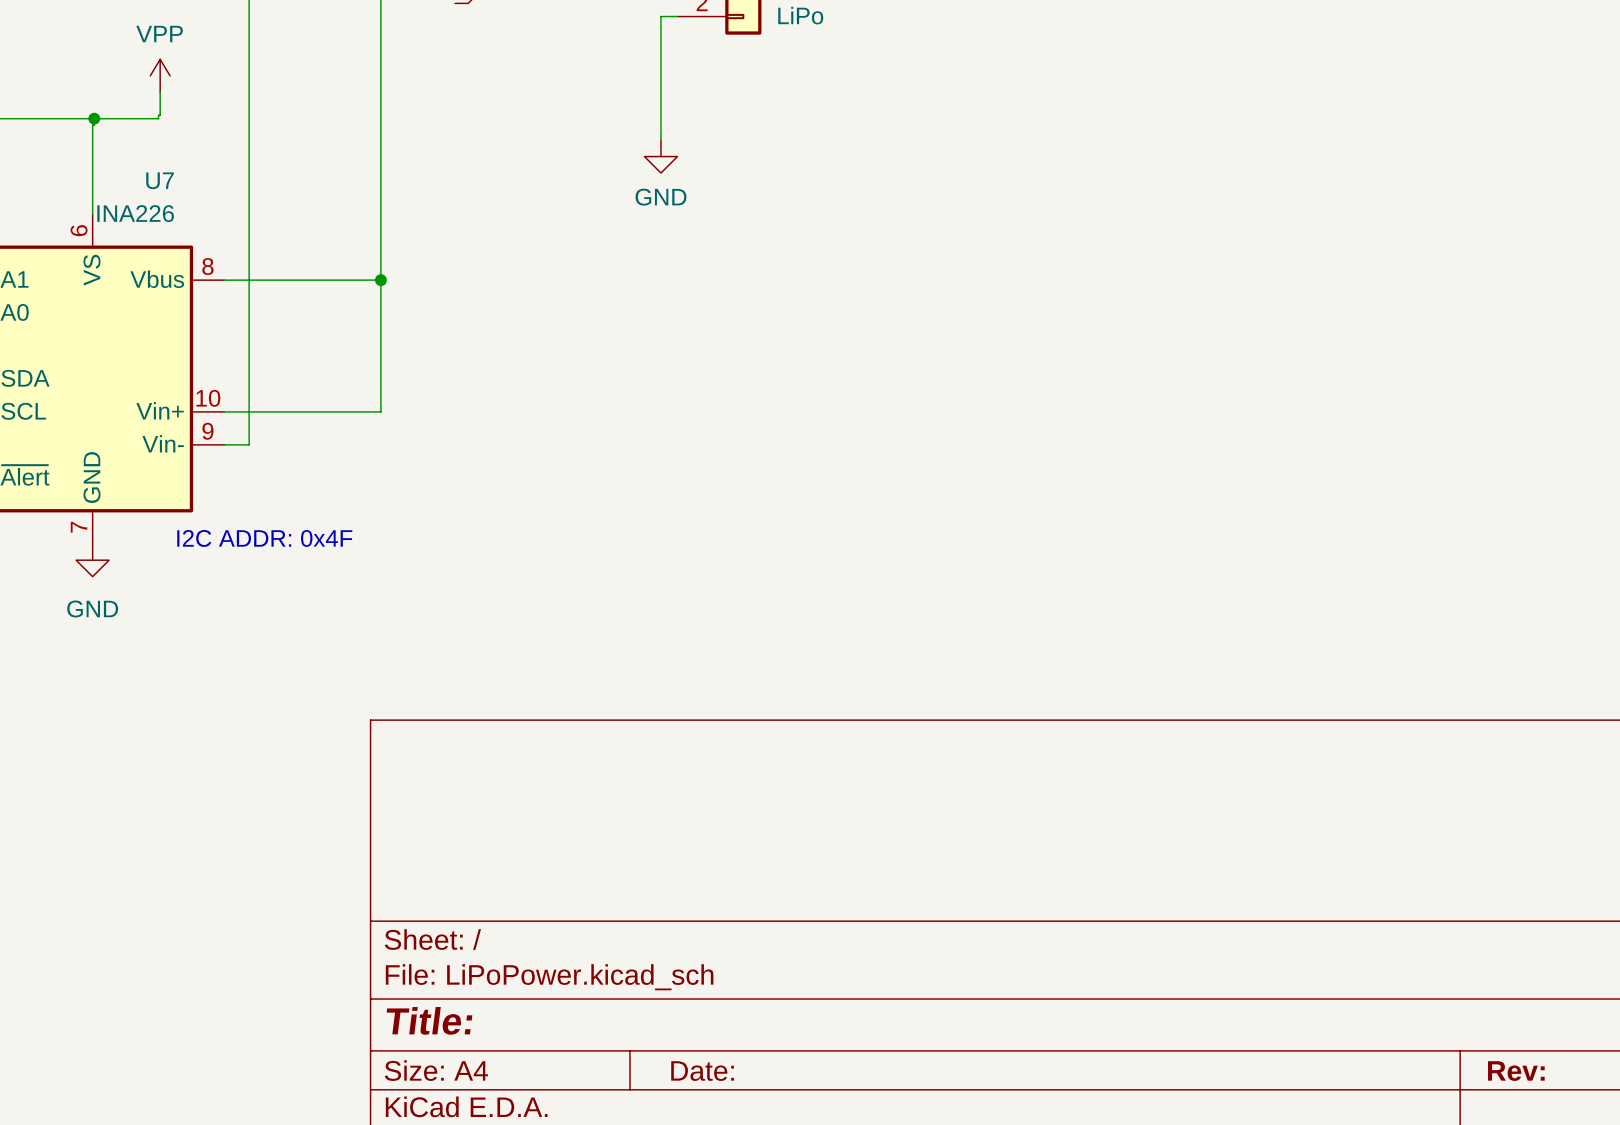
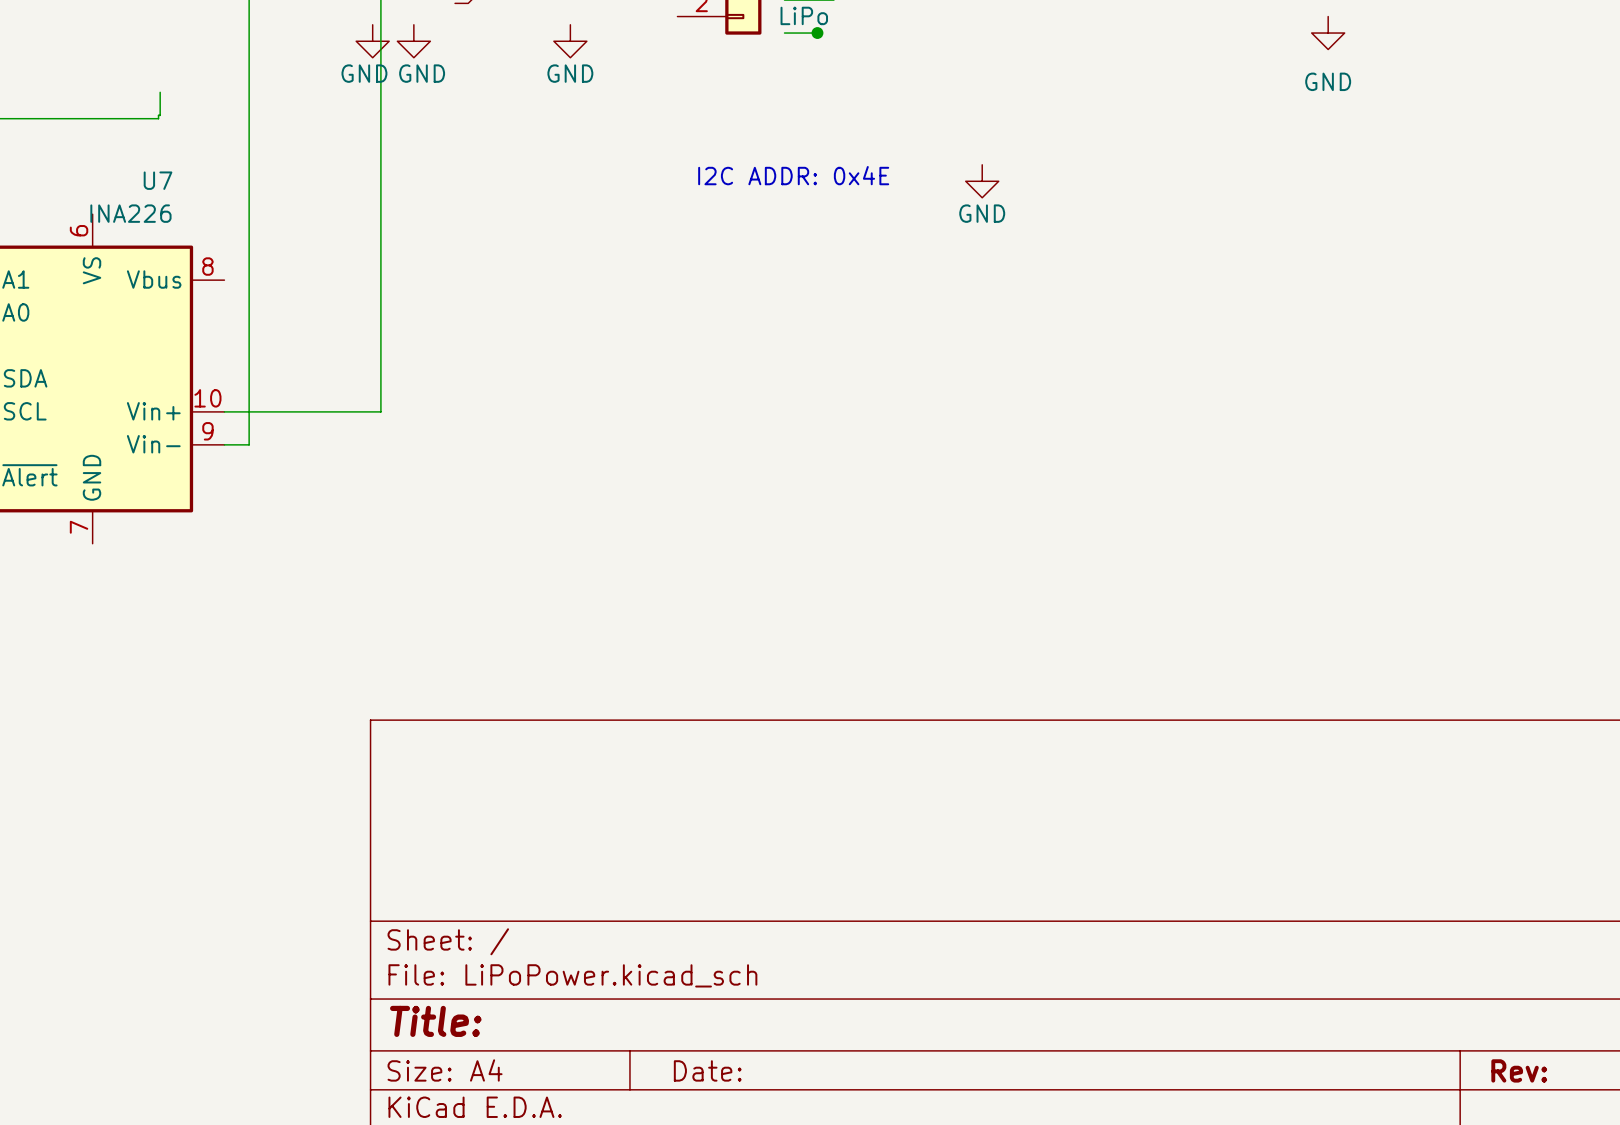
wire: none -> (784, 0) (833, 0)
wire: (677, 16) (660, 16) (660, 140) -> none
wire: none -> (784, 33) (817, 33)
junction: none -> (817, 33)
power symbol: none -> GND (1328, 33)
power symbol: none -> GND (372, 41)
power symbol: none -> GND (413, 41)
power symbol: none -> GND (570, 41)
power symbol: VPP (160, 75) -> none
wire: (94, 118) (94, 125) (92, 125) (92, 214) -> none
junction: (94, 118) -> none
power symbol: GND (660, 156) -> none
text: none -> I2C ADDR: 0x4E (793, 175)
power symbol: none -> GND (982, 181)
wire: (224, 280) (380, 280) -> none
junction: (380, 280) -> none
text: I2C ADDR: 0x4F (264, 538) -> none
power symbol: GND (92, 560) -> none

